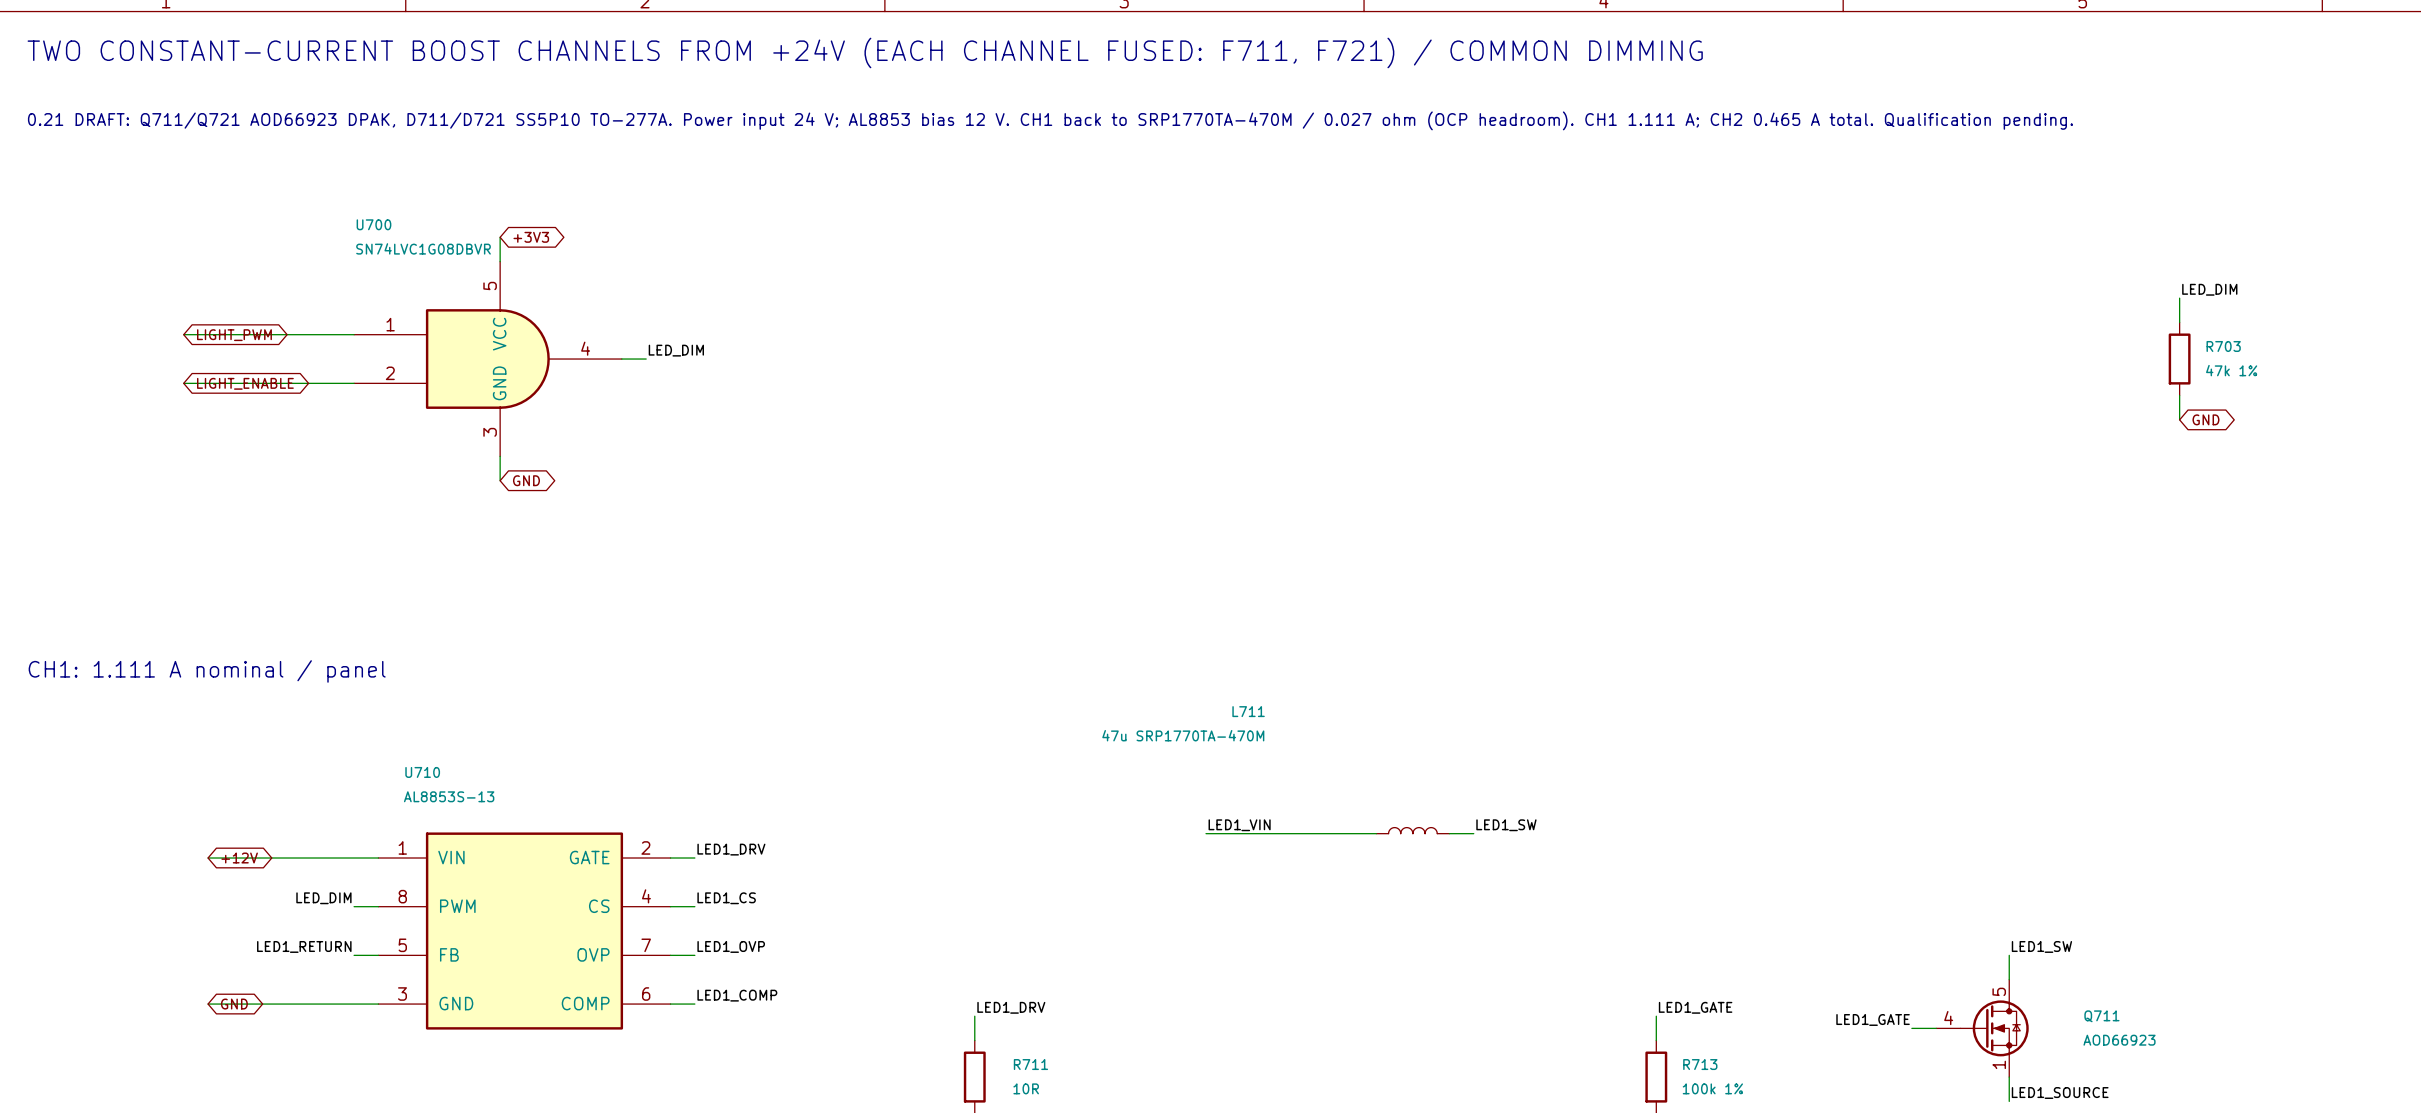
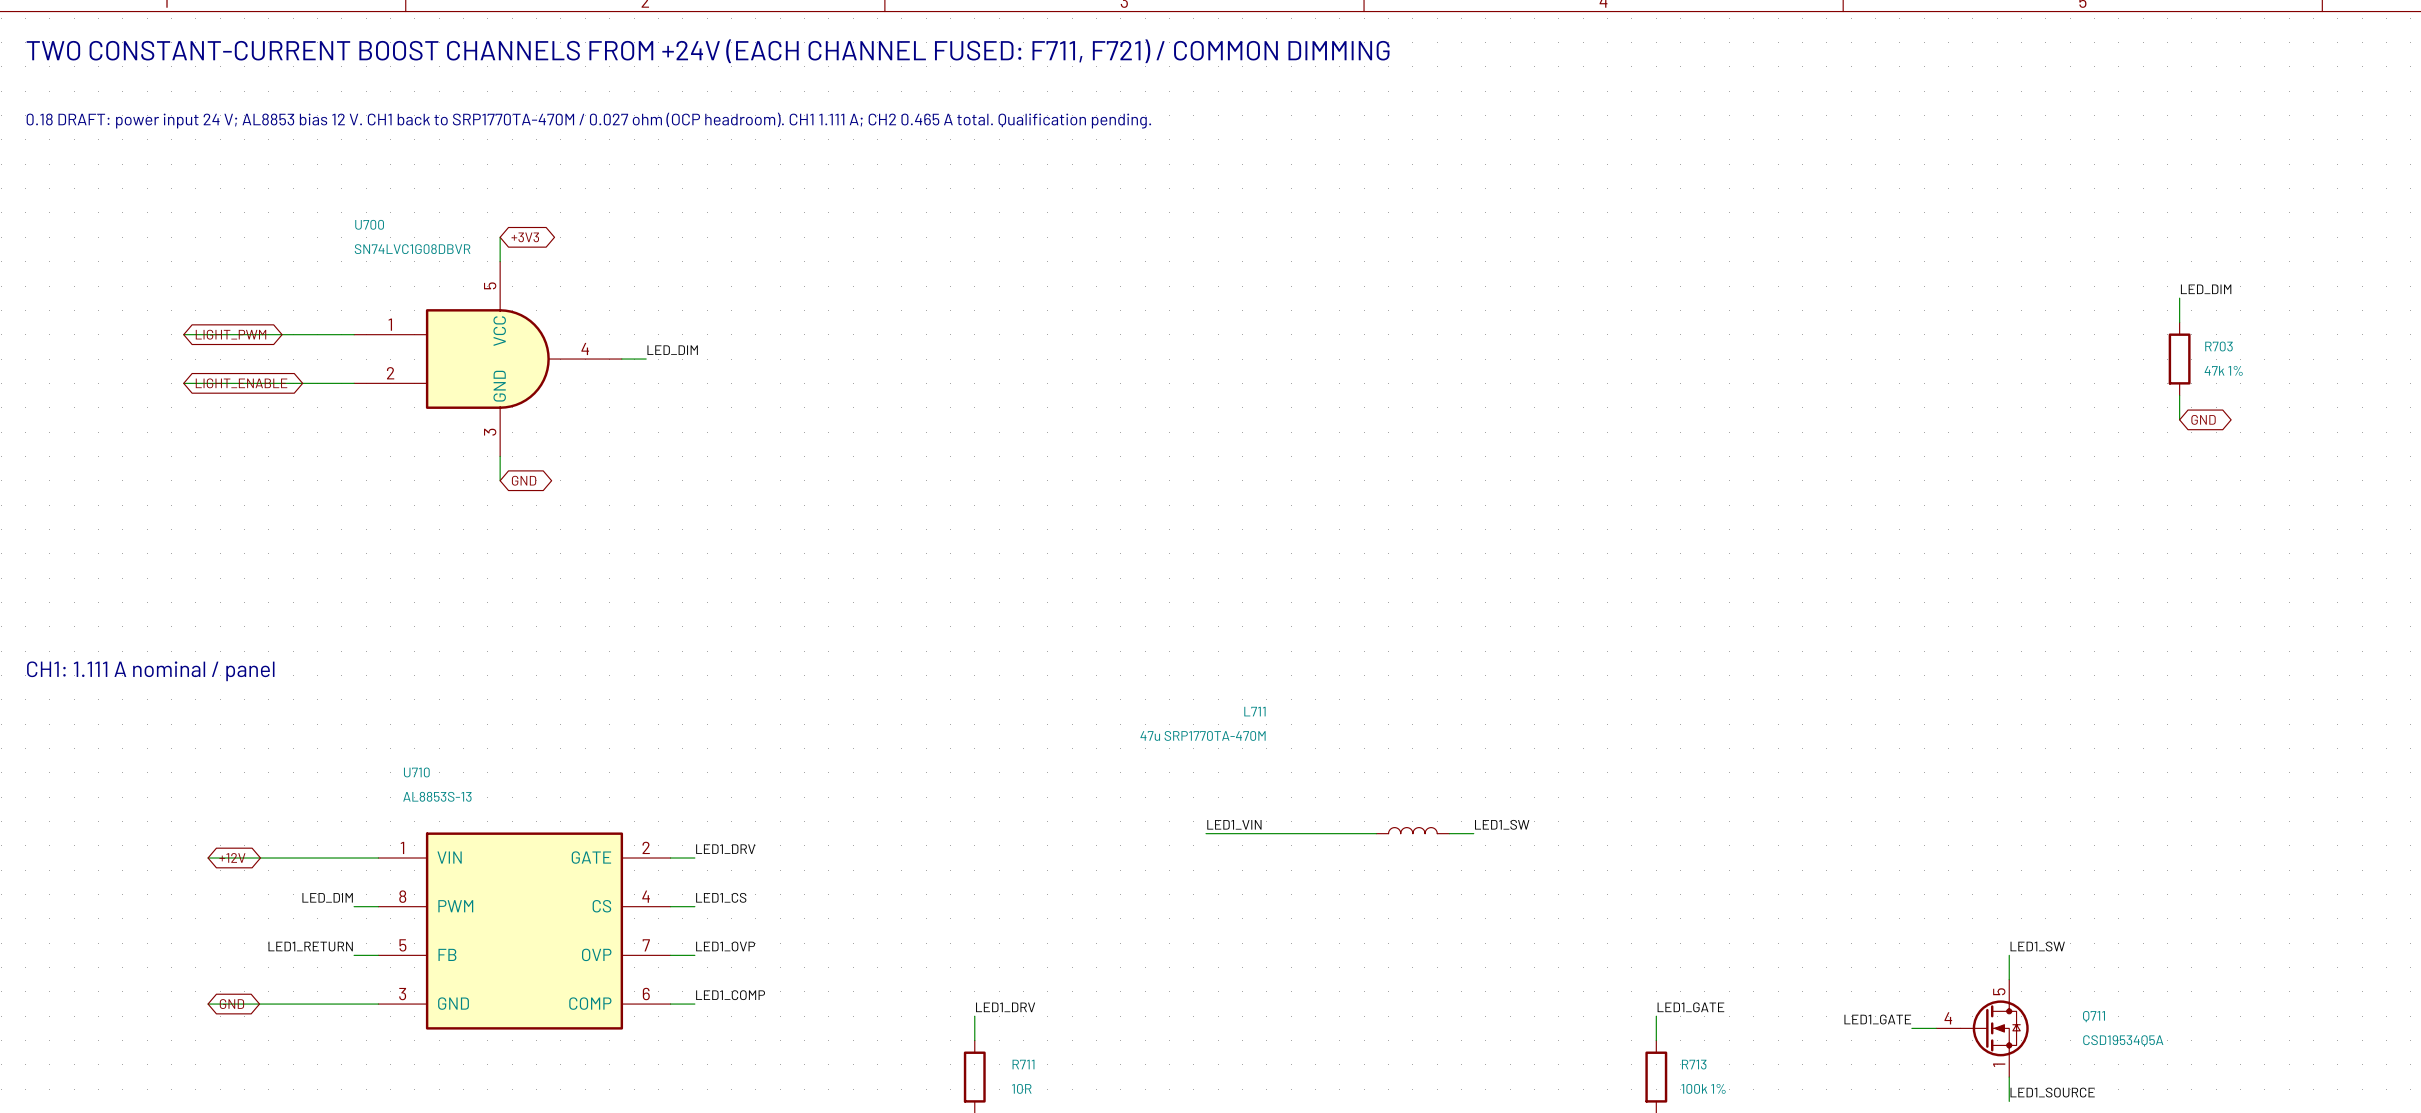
text: 0.21 DRAFT: Q711/Q721 AOD66923 DPAK, D711/D721 SS5P10 TO-277A. Power input 24 V; AL8853 bias 12 V. CH1 back to SRP1770TA-470M / 0.027 ohm (OCP headroom). CH1 1.111 A; CH2 0.465 A total. Qualification pending. (1050, 120) -> 0.18 DRAFT: power input 24 V; AL8853 bias 12 V. CH1 back to SRP1770TA-470M / 0.027 ohm (OCP headroom). CH1 1.111 A; CH2 0.465 A total. Qualification pending. (588, 120)
Q711 value: AOD66923 (2119, 1040) -> CSD19534Q5A (2123, 1040)

